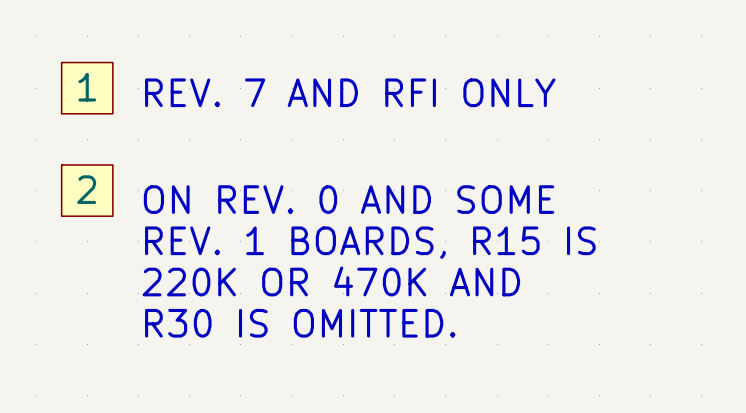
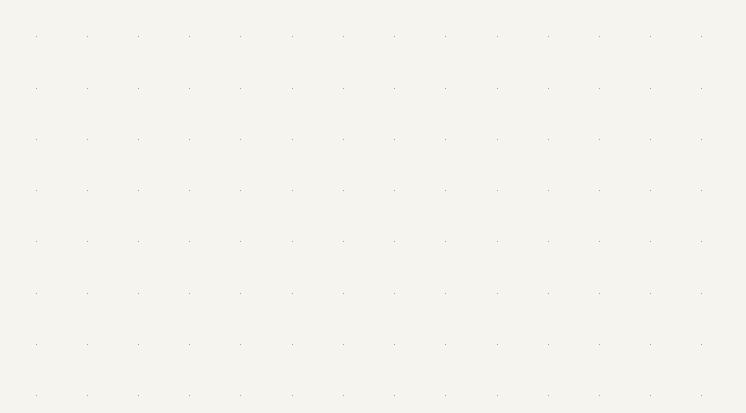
part: 1 (87, 88) -> none
text: REV. 7 AND RFI ONLY (350, 92) -> none
part: 2 (87, 190) -> none
text: ON REV. 0 AND SOME (349, 199) -> none
text: REV. 1 BOARDS, R15 IS (370, 242) -> none
text: 220K OR 470K AND (331, 281) -> none
text: R30 IS OMITTED. (300, 323) -> none

